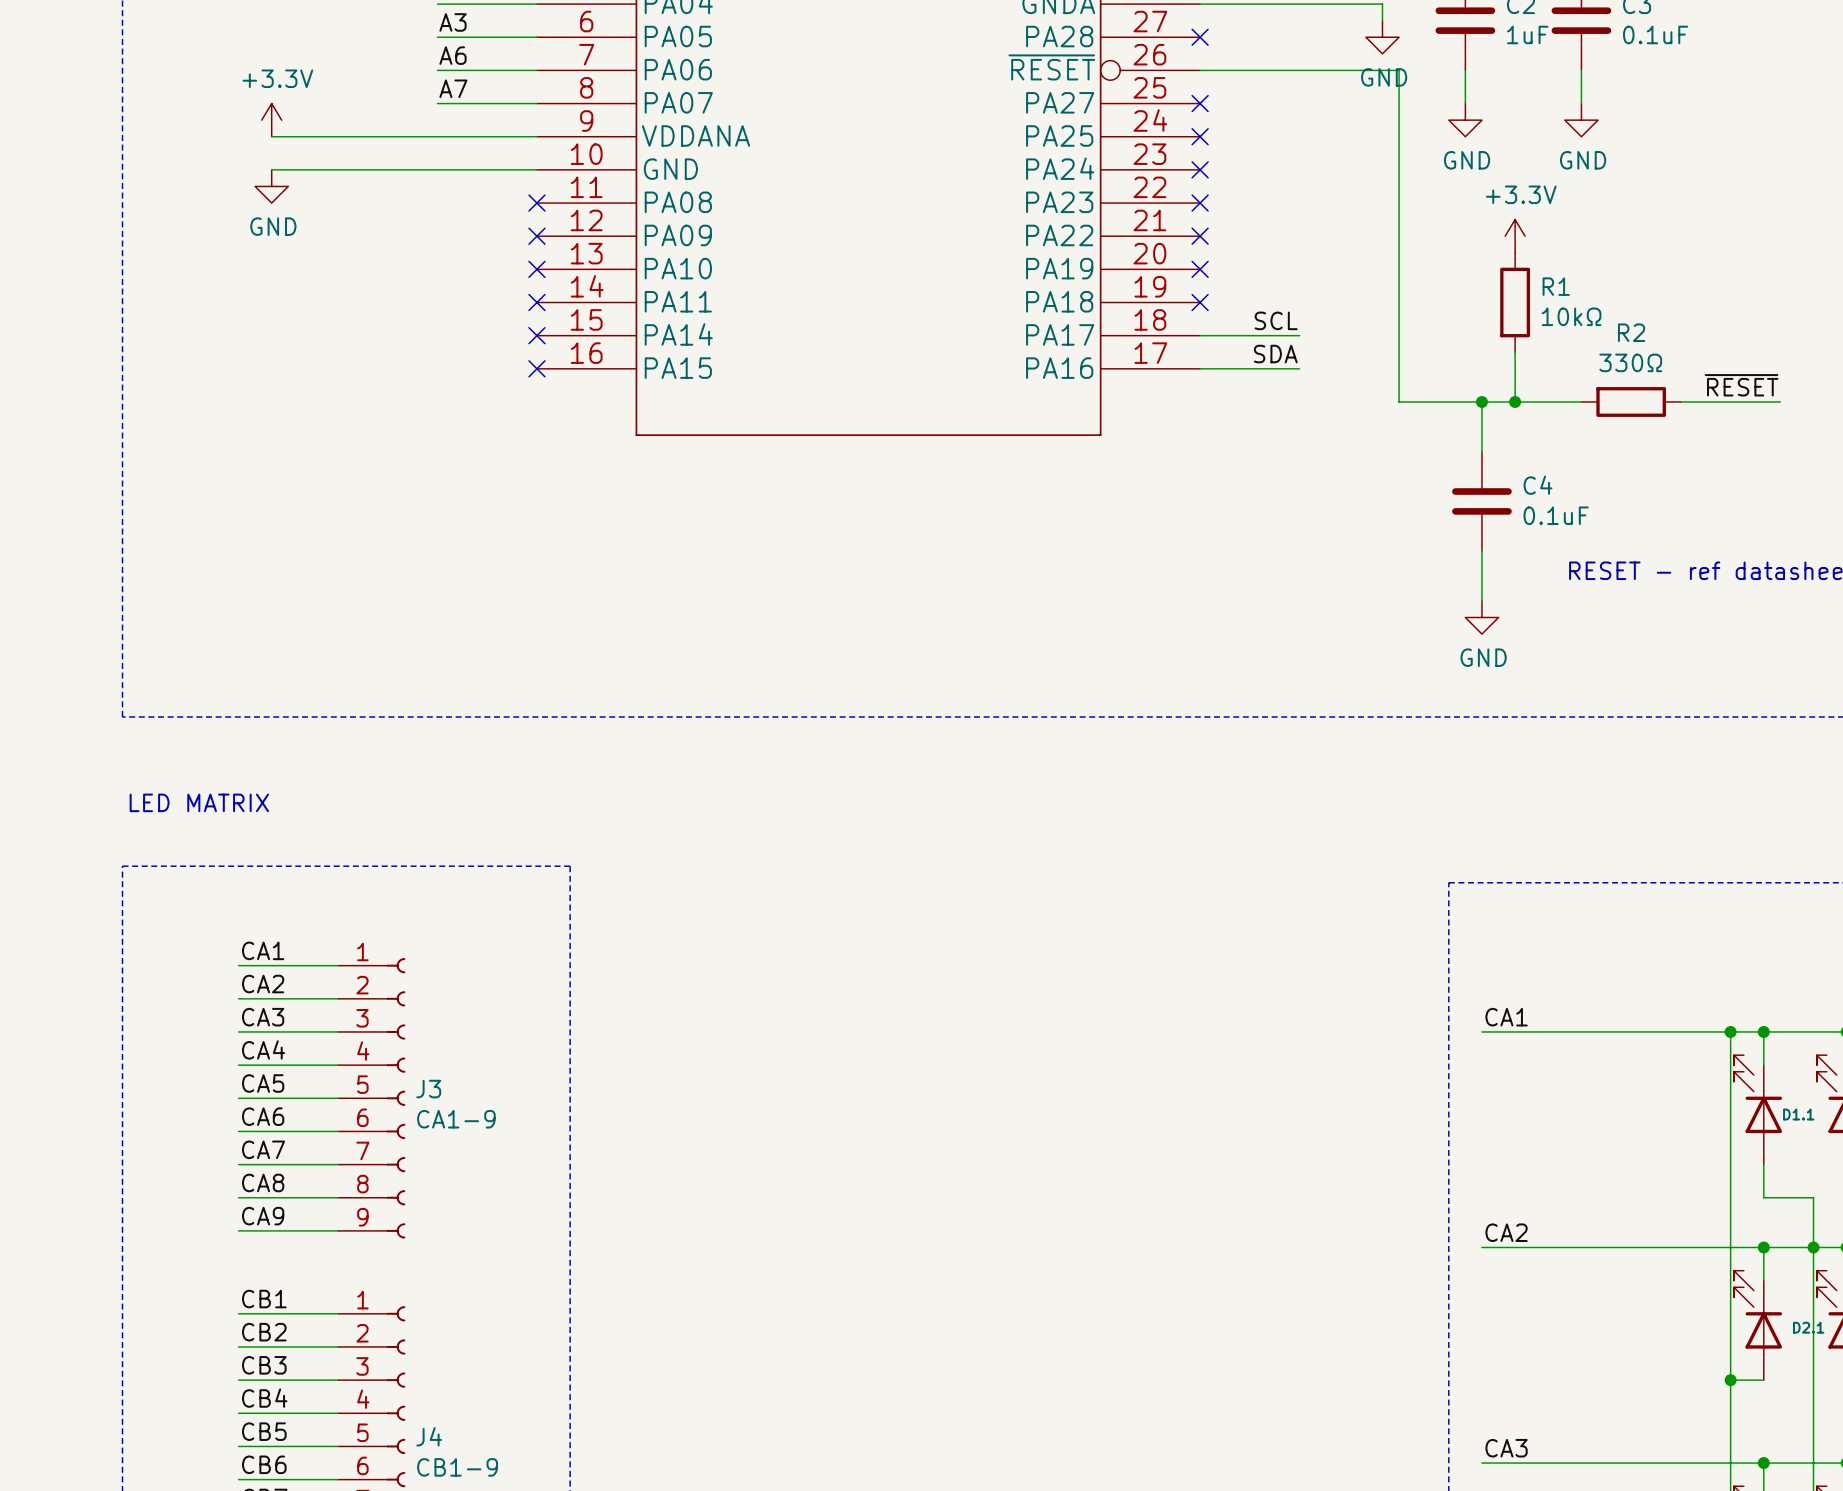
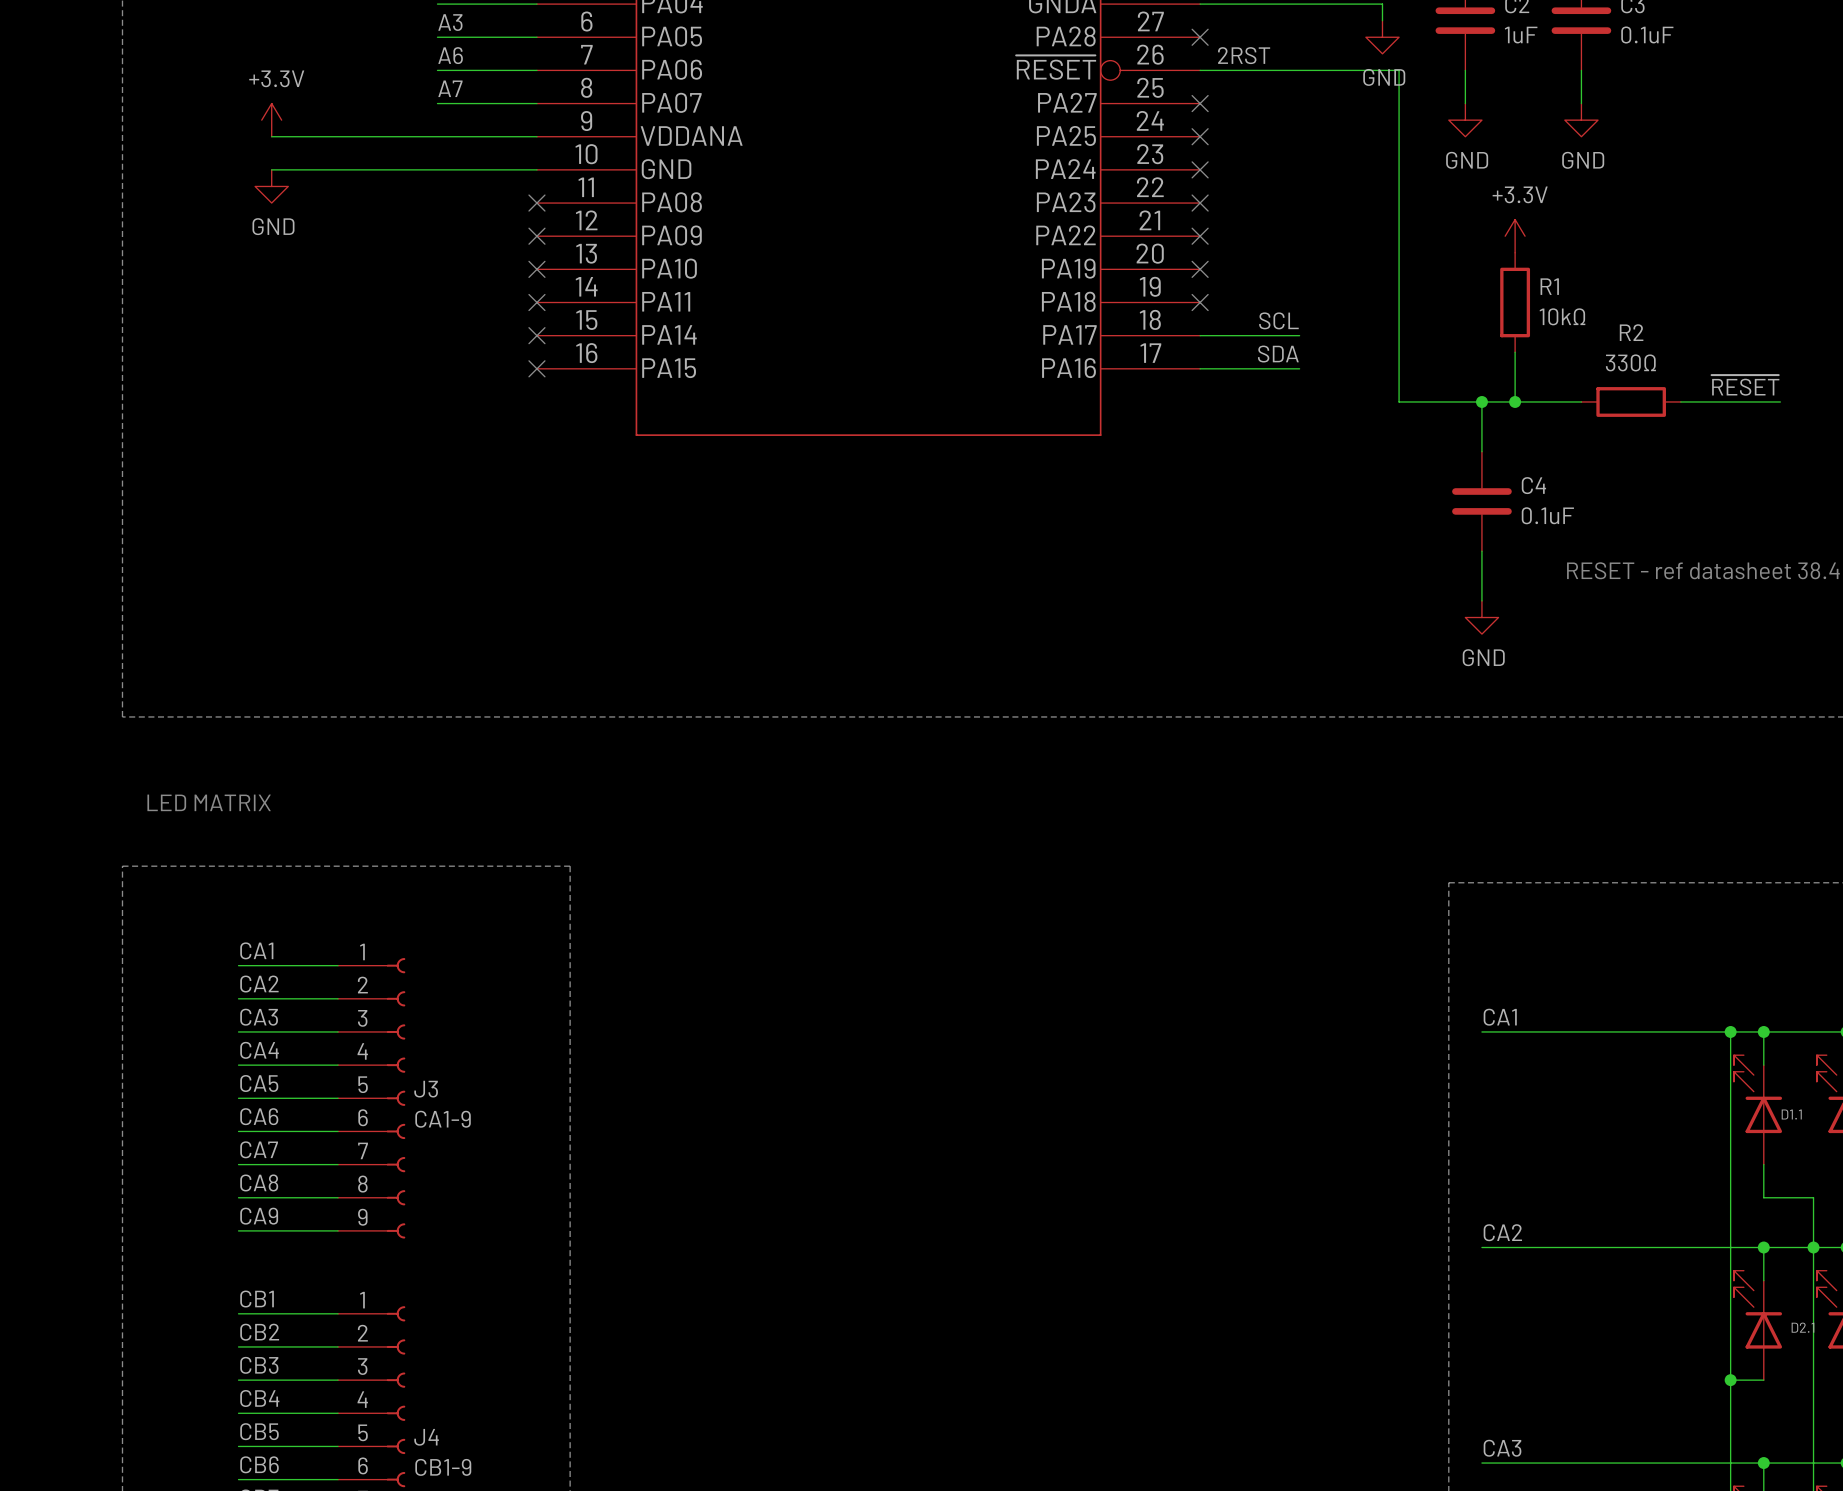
label: none -> 2RST (1244, 55)

